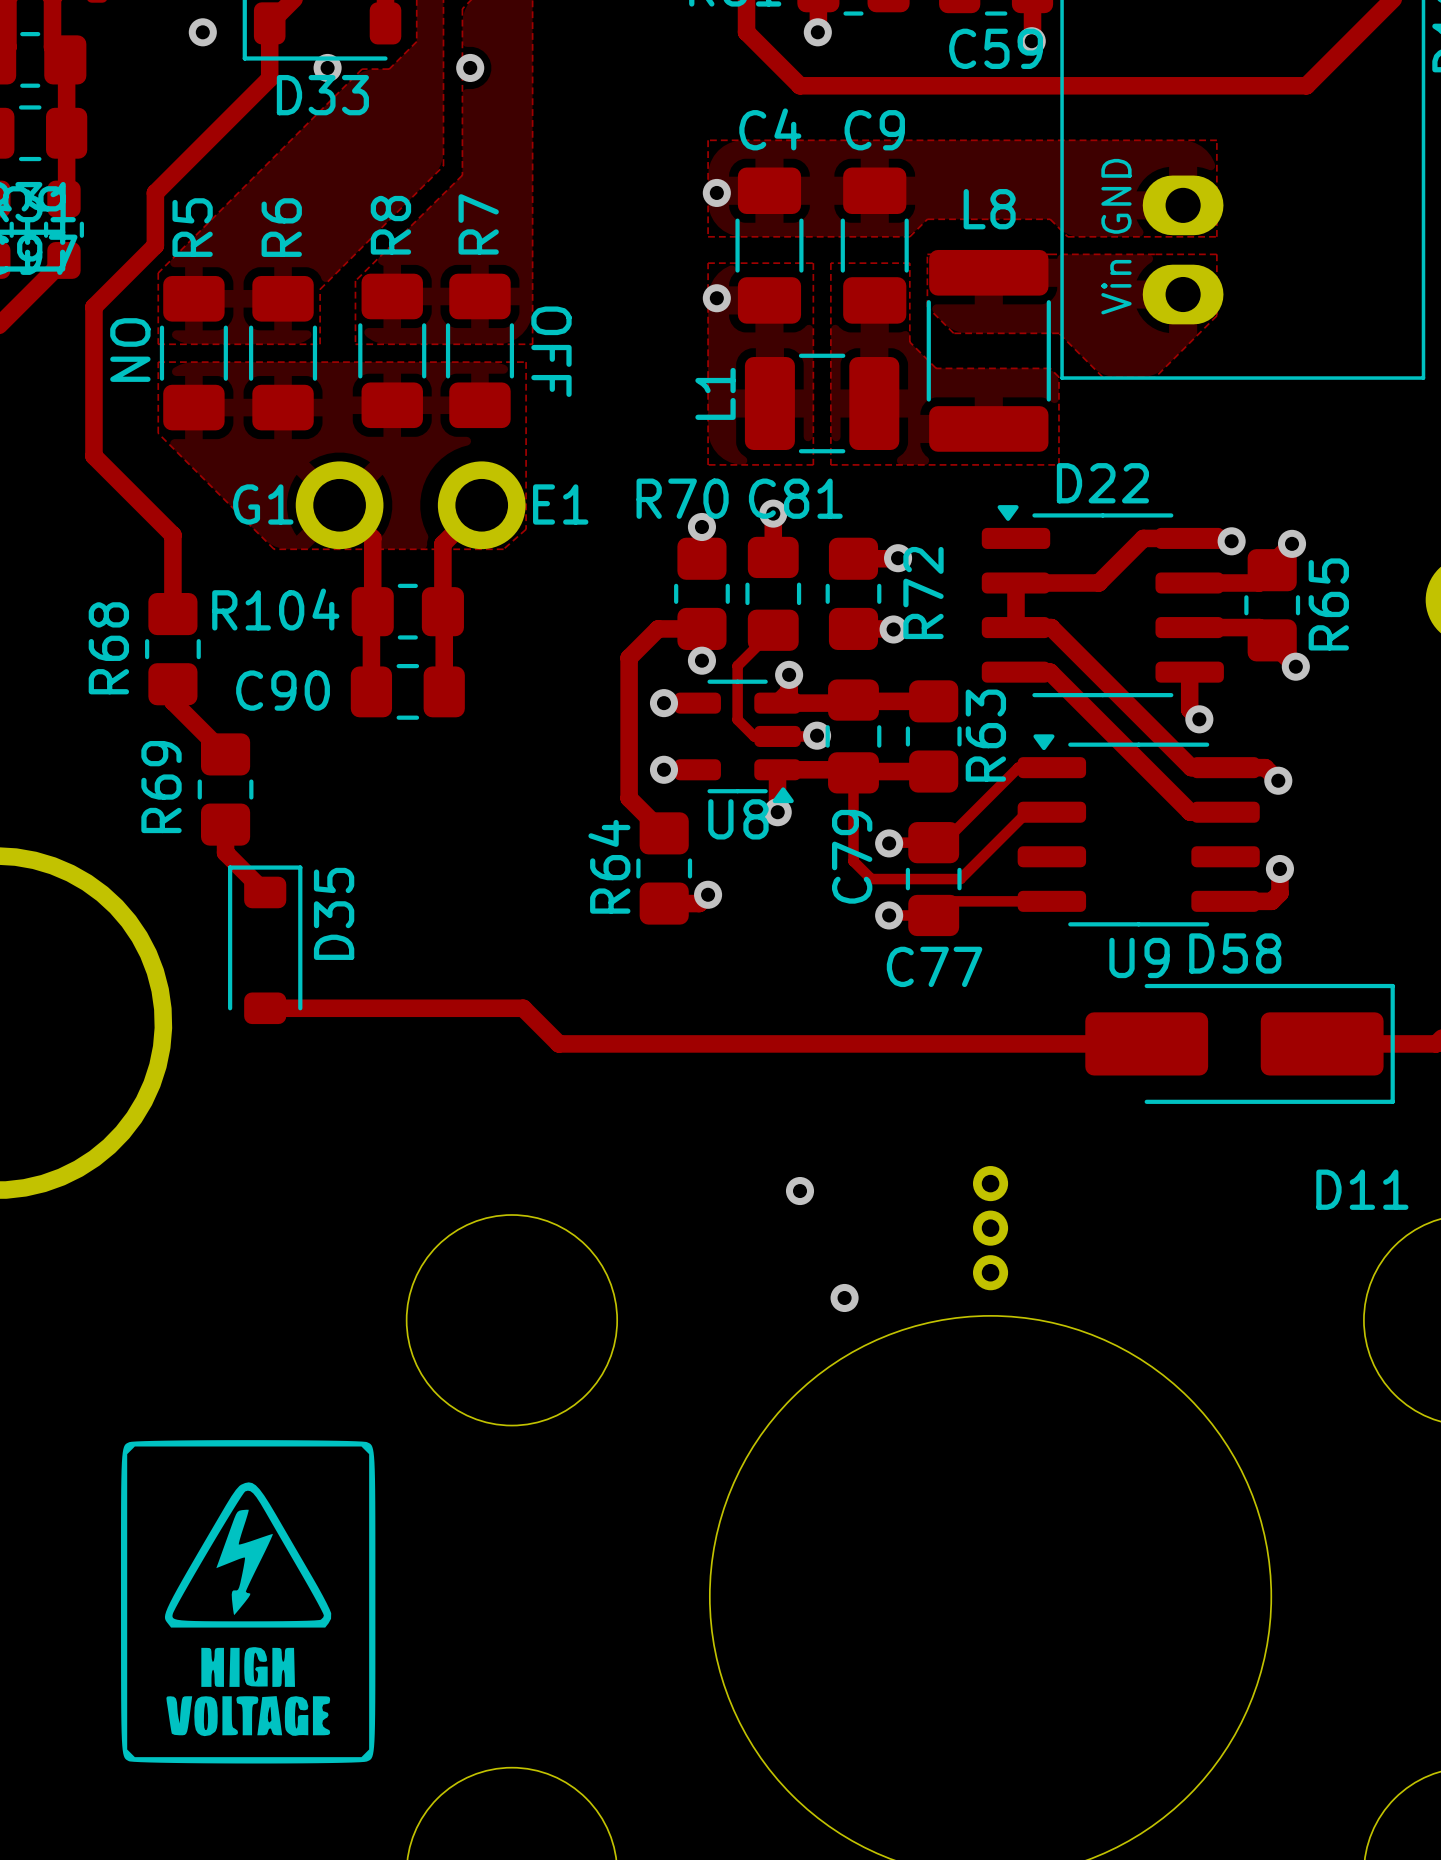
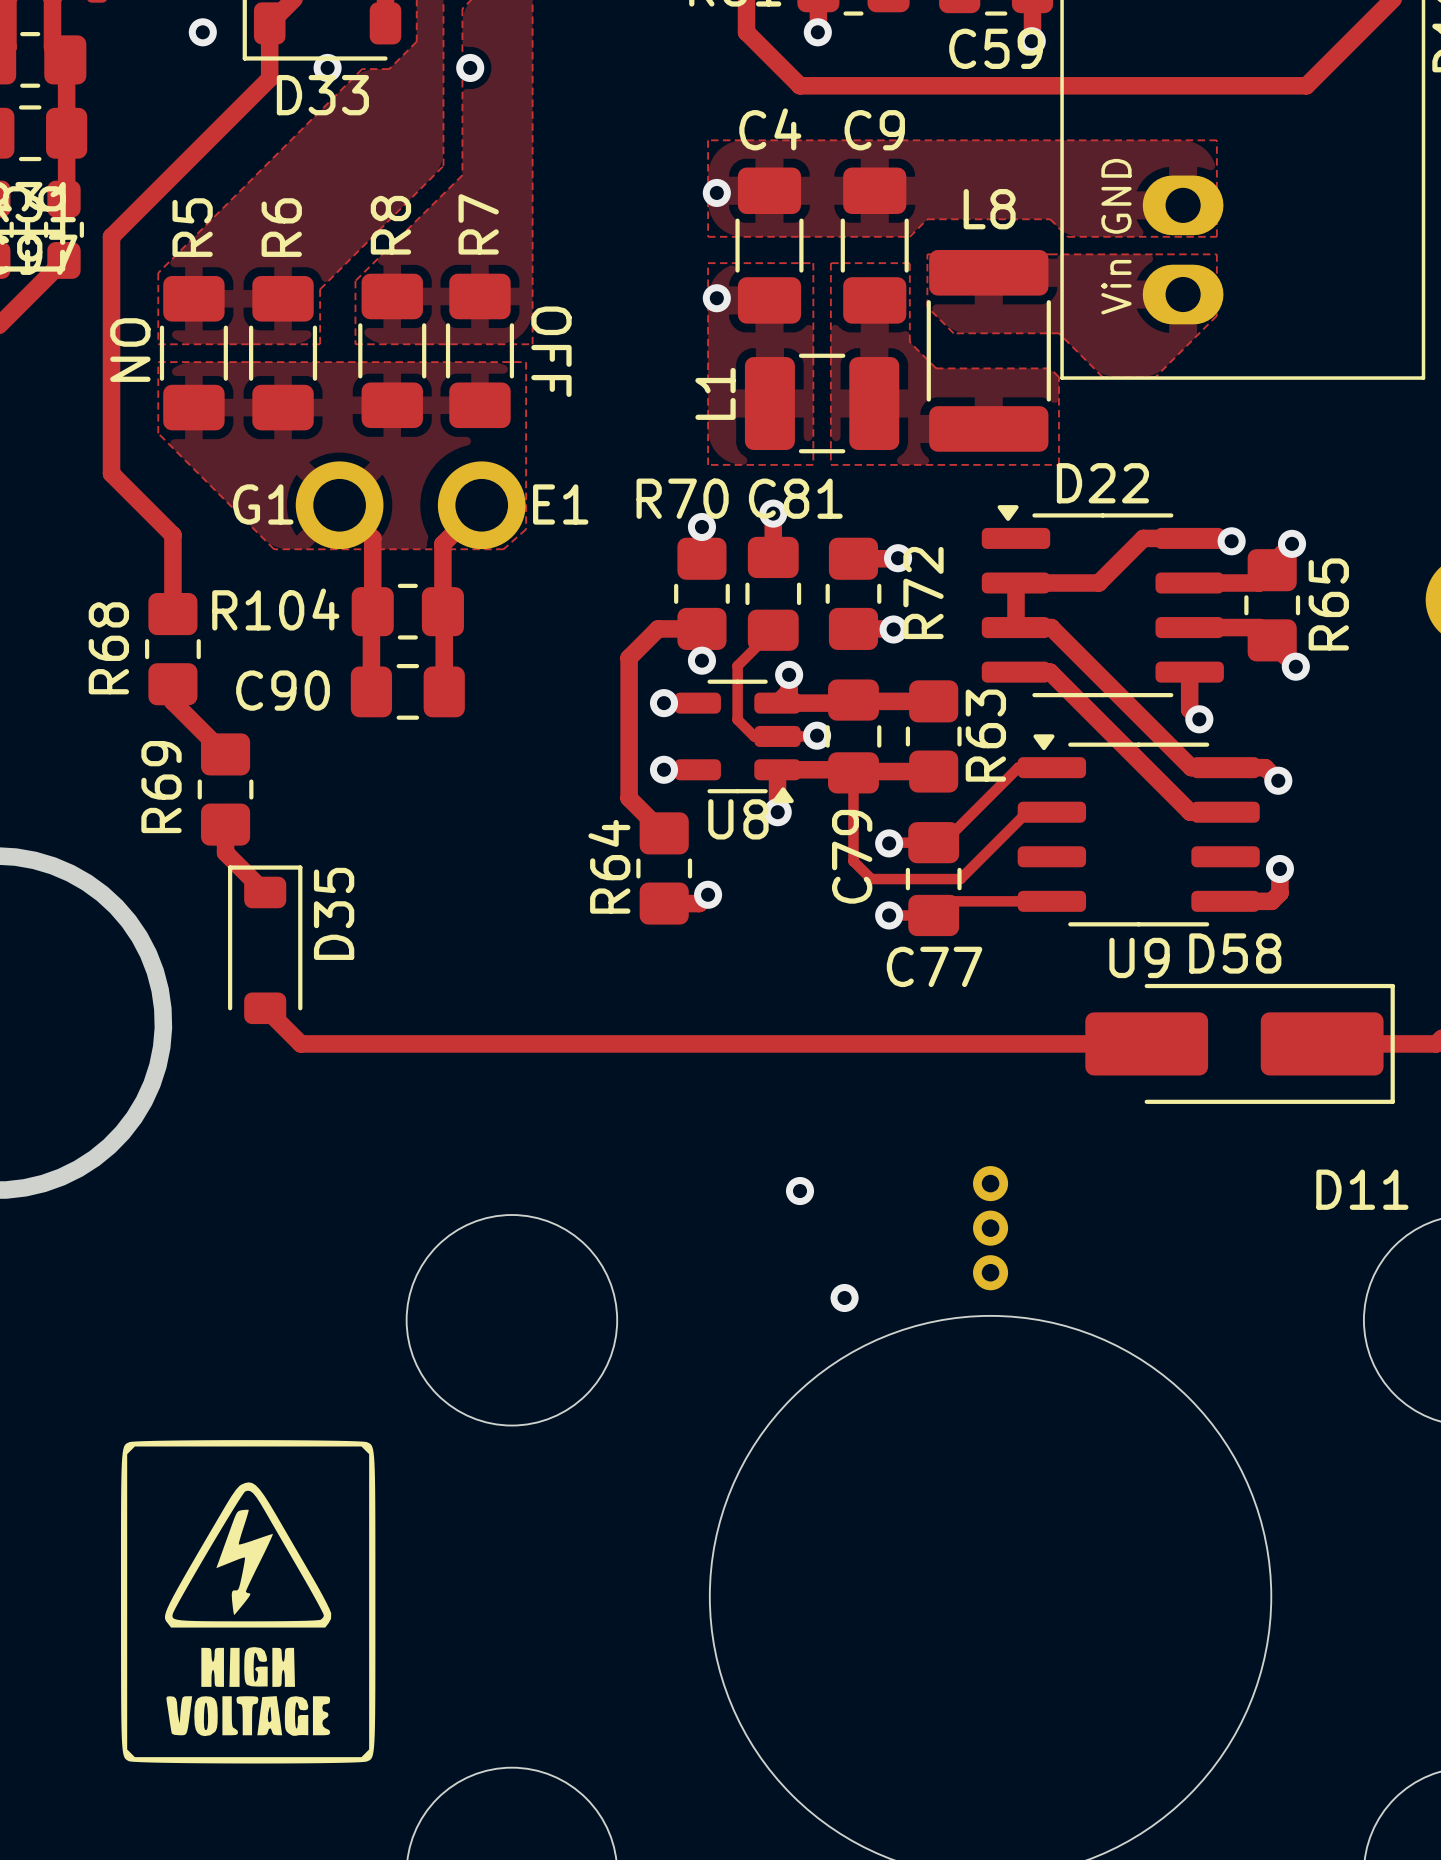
track: (155, 192) (155, 245) (93, 307) (93, 456) (111, 473) -> (155, 192) (111, 236) (111, 473)
track: (265, 1008) (523, 1008) (558, 1043) -> (265, 1008) (300, 1043) (558, 1043)

